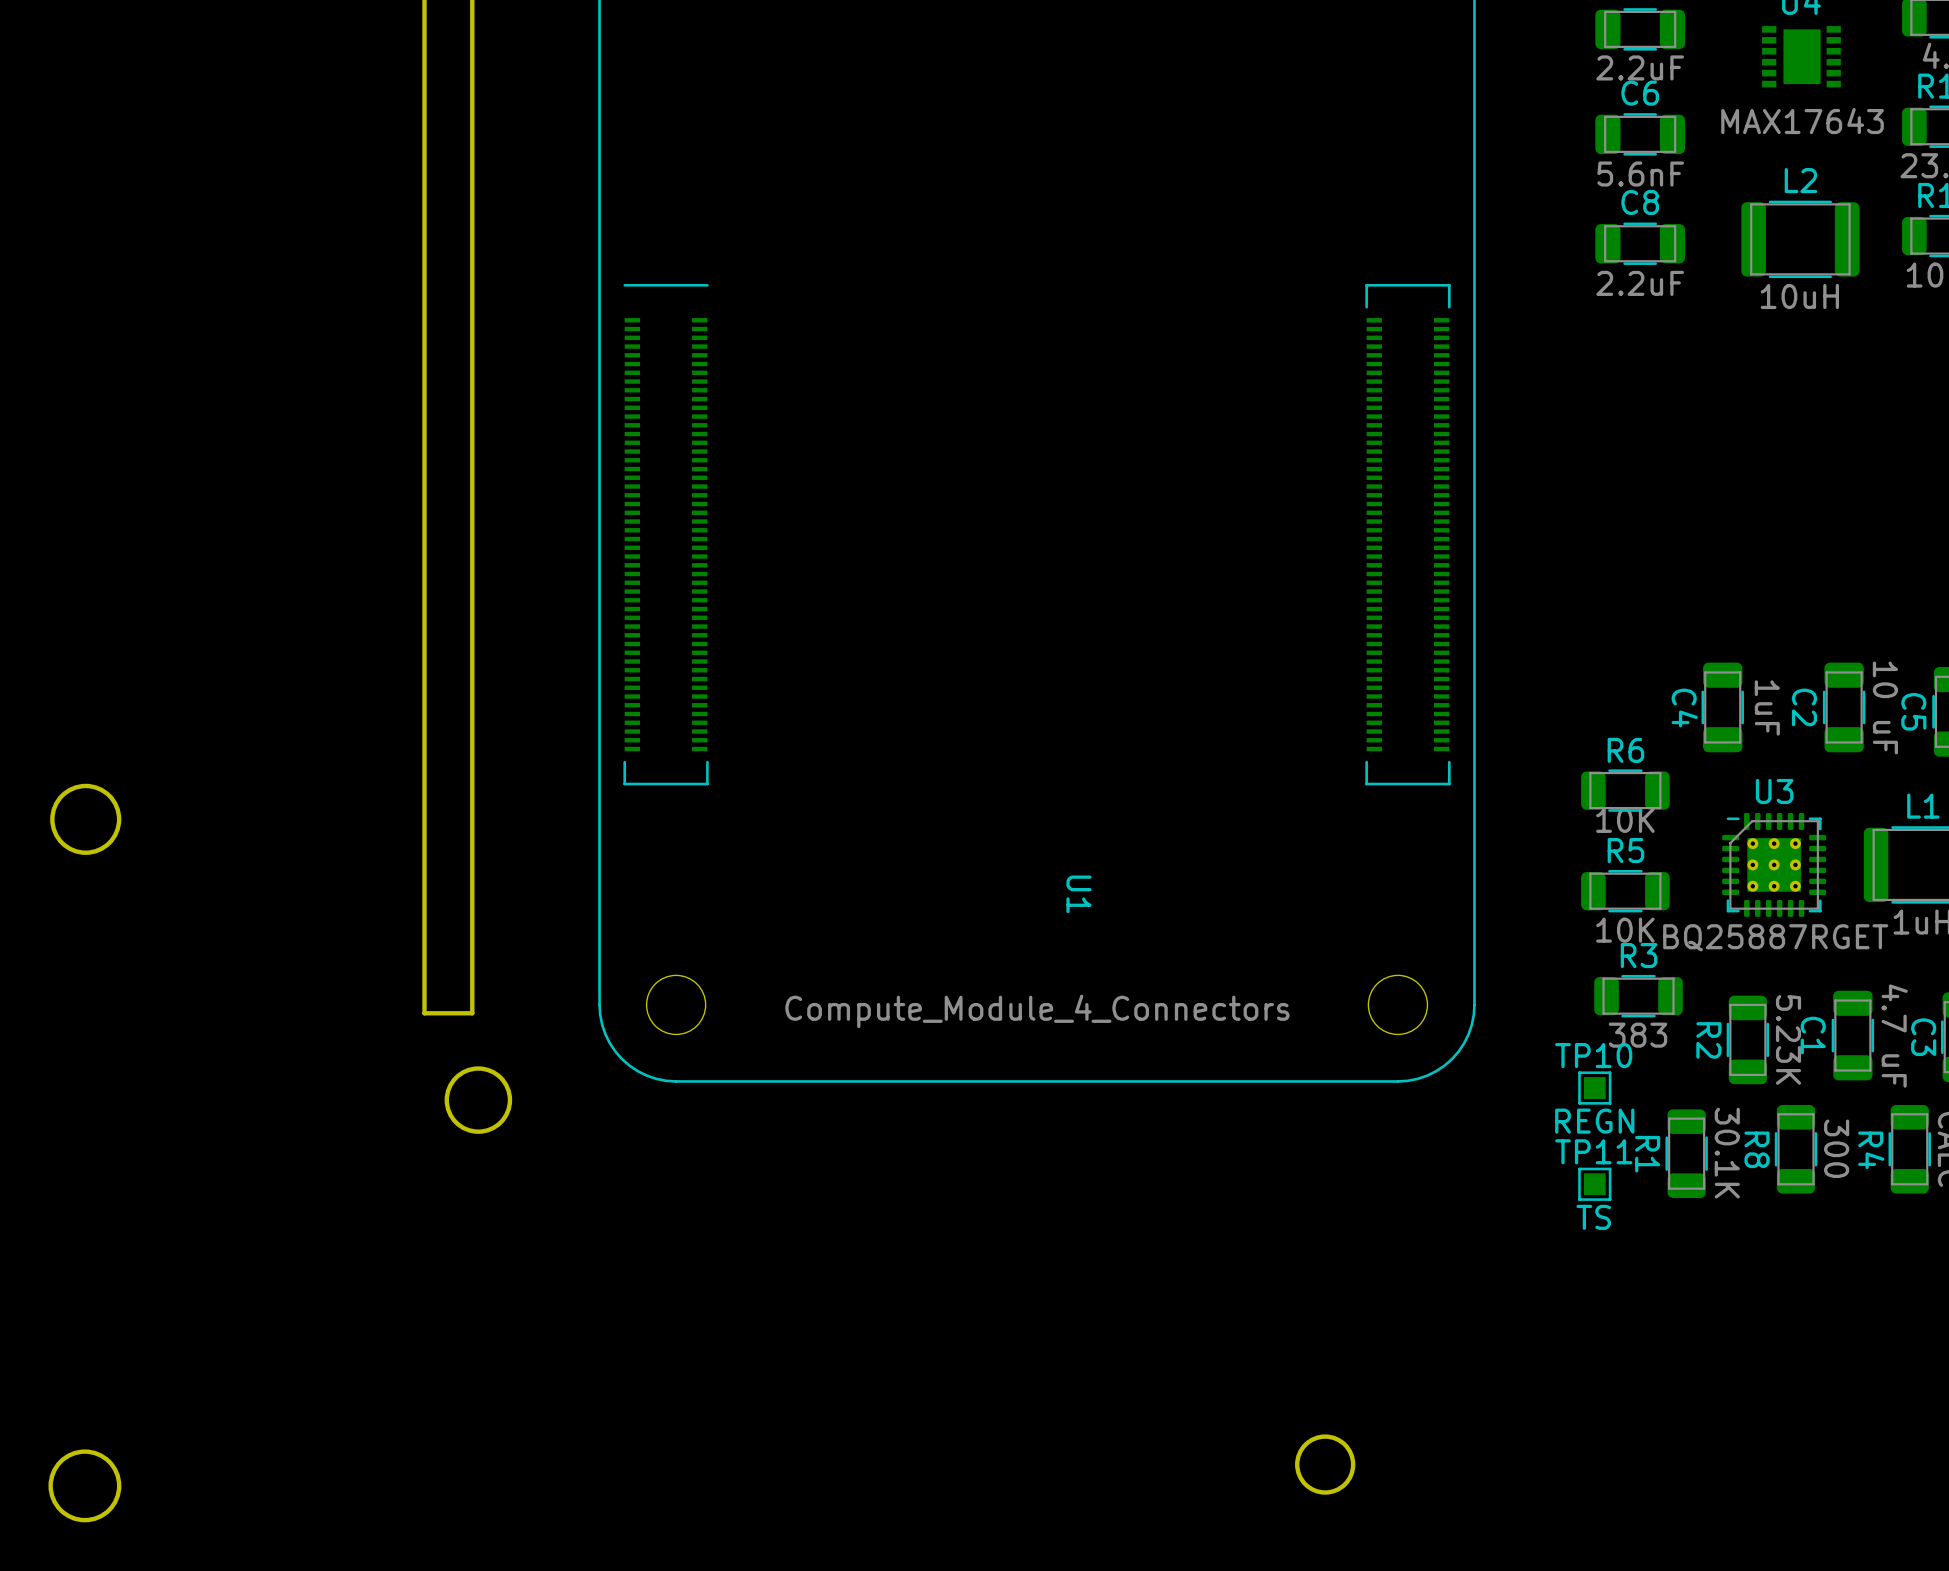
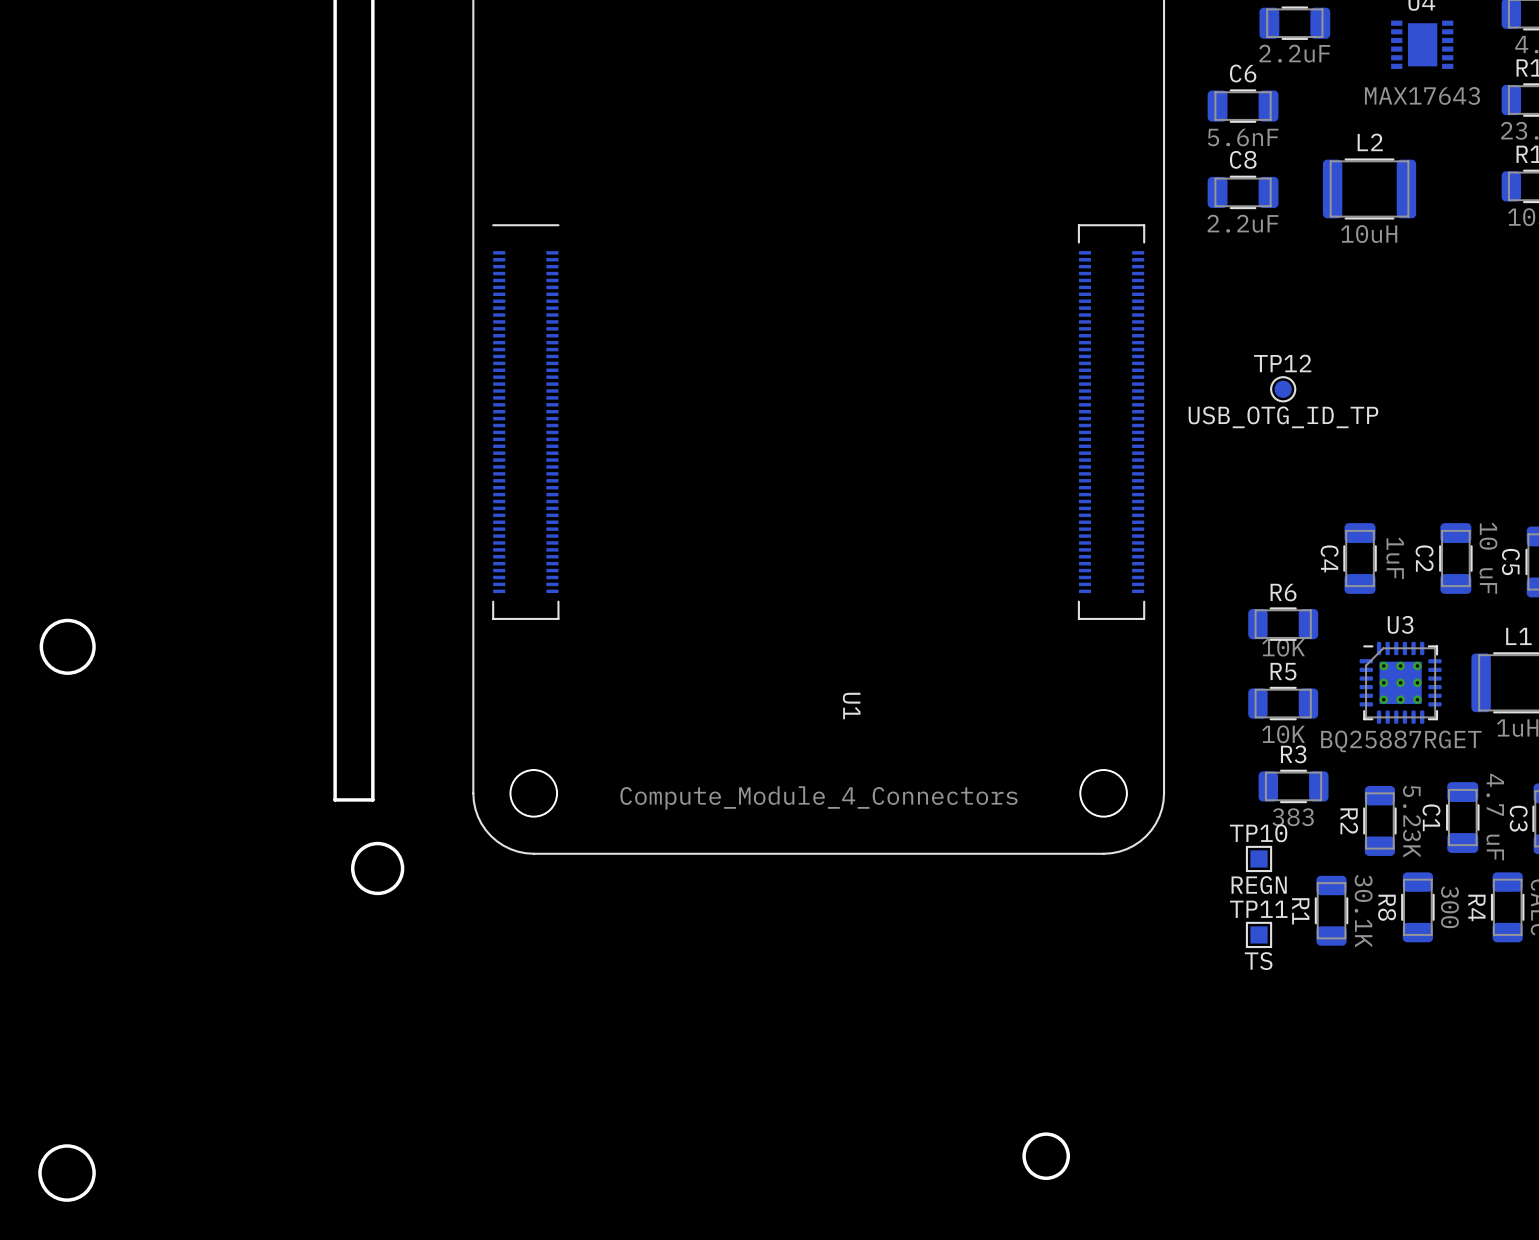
C6 position: (1640, 134) -> (1243, 106)
L2 position: (1800, 239) -> (1369, 188)
C8 position: (1640, 243) -> (1243, 192)
TP12: none -> USB_OTG_ID_TP (1283, 389)

